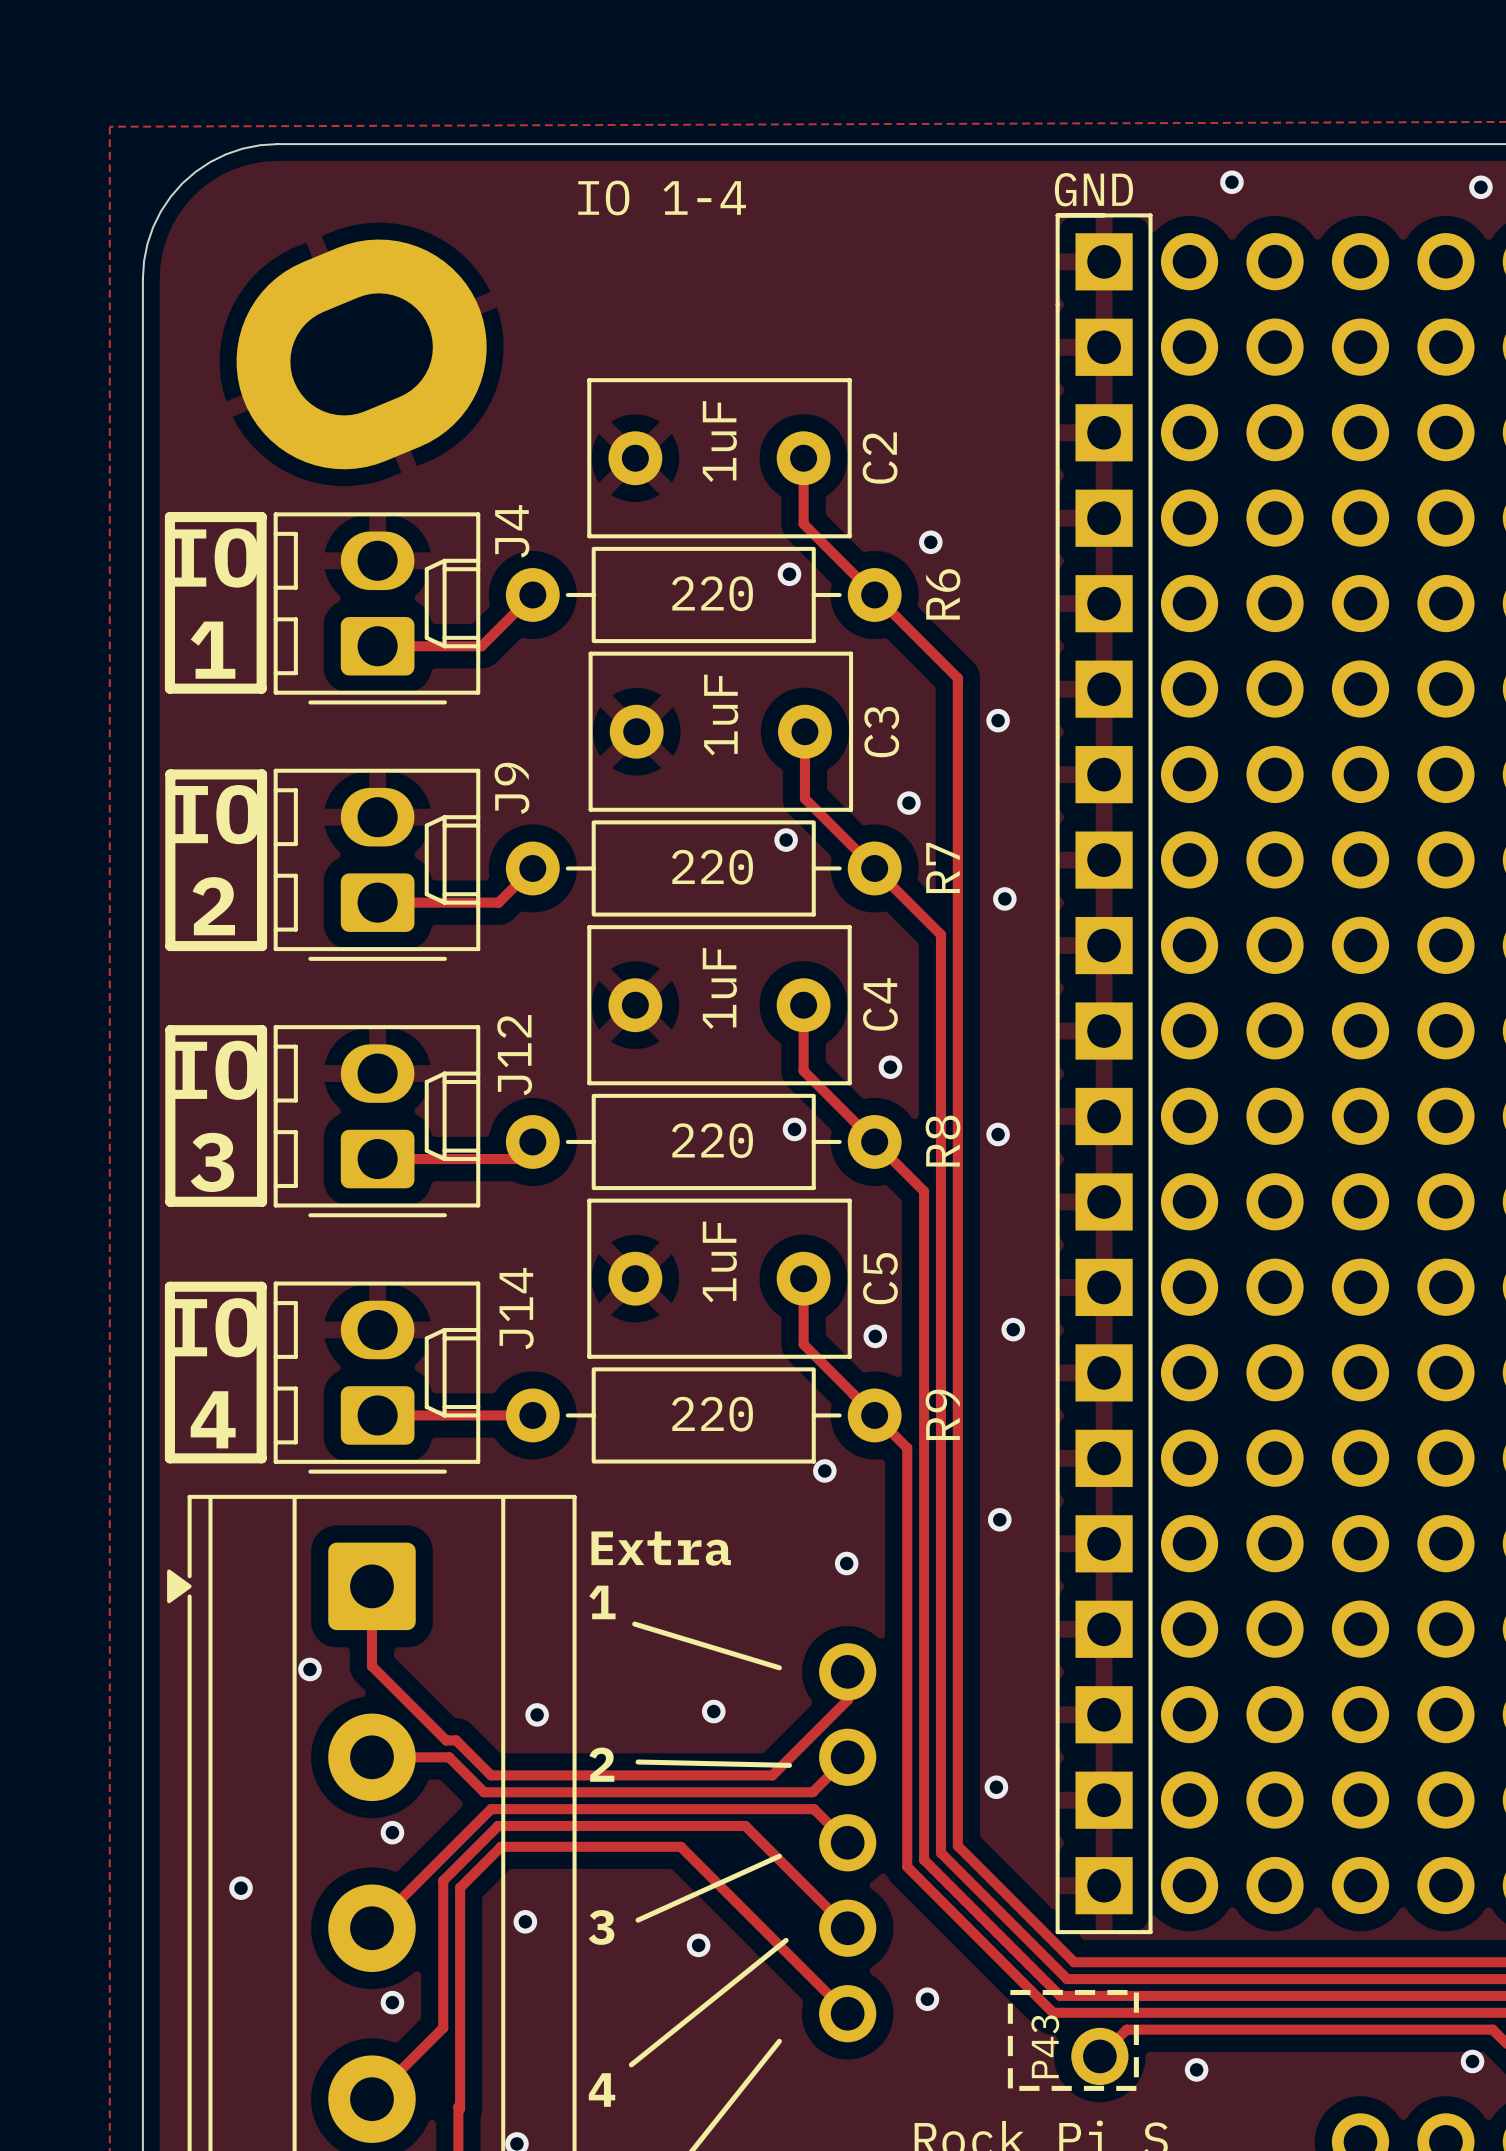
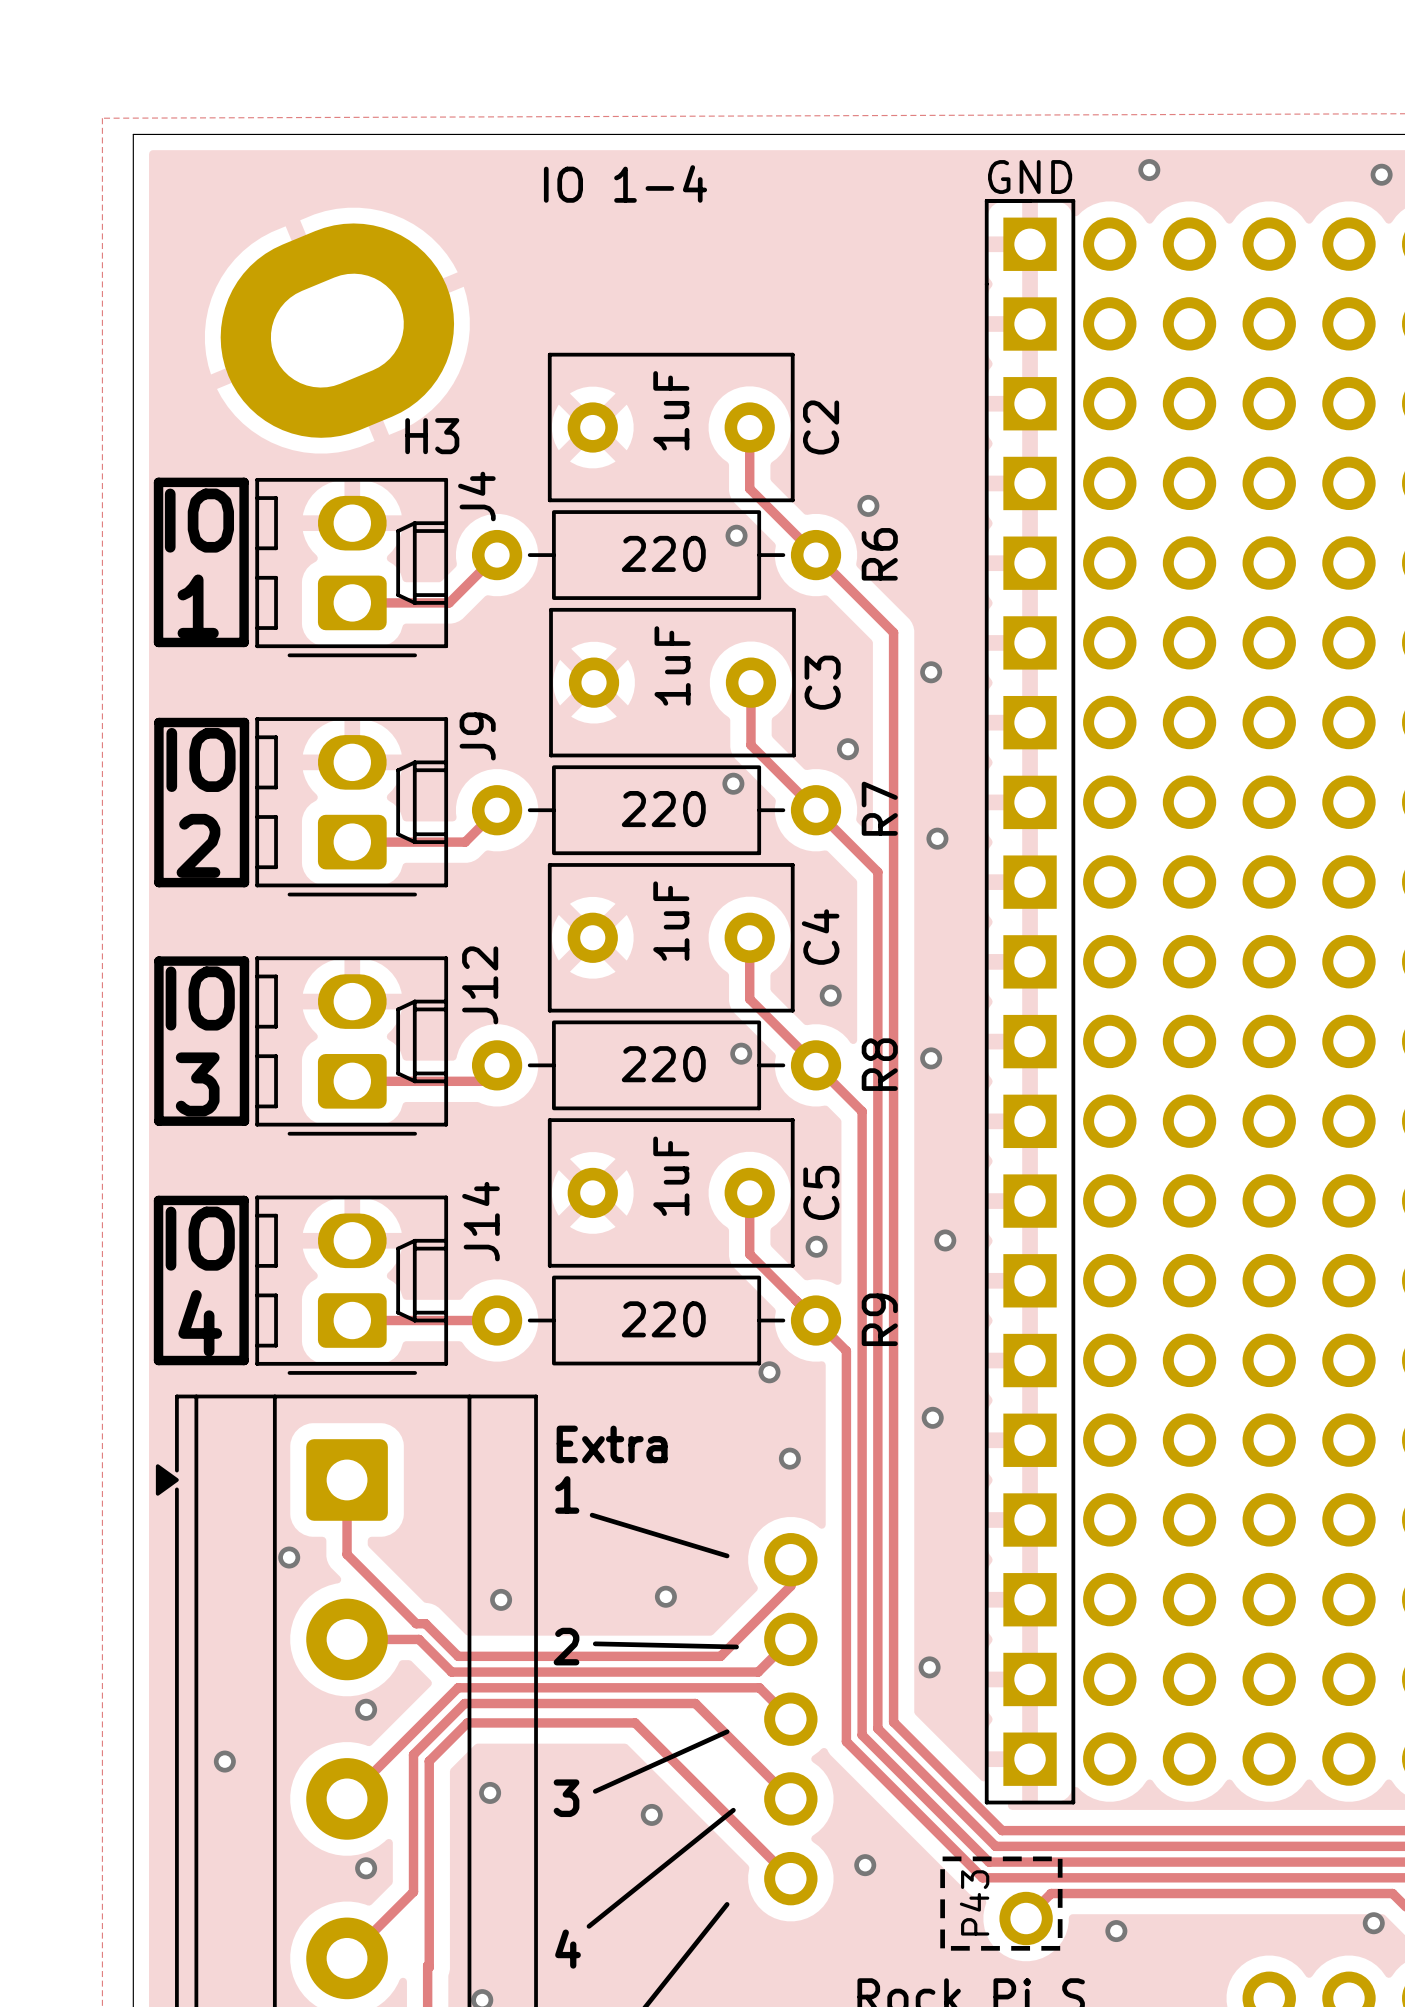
board edge: (277, 144) (242, 148) (225, 154) (210, 162) (182, 183) (160, 211) (153, 227) (144, 261) (142, 278) -> (258, 134) (133, 134) (133, 259)
H3 name: none -> H3 (432, 436)

